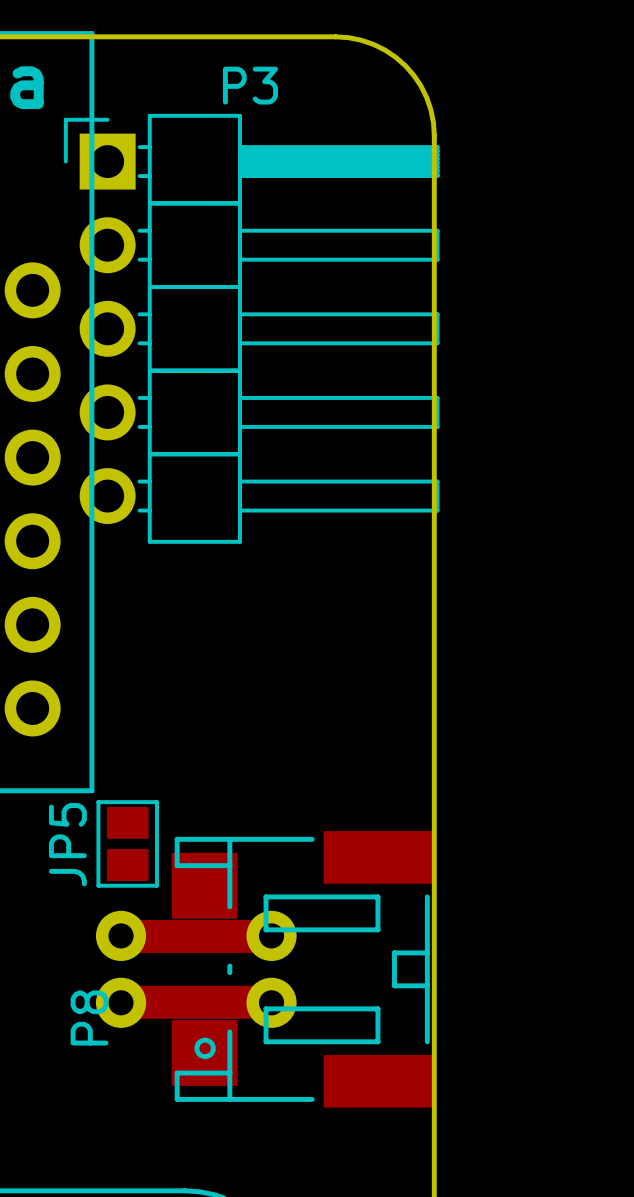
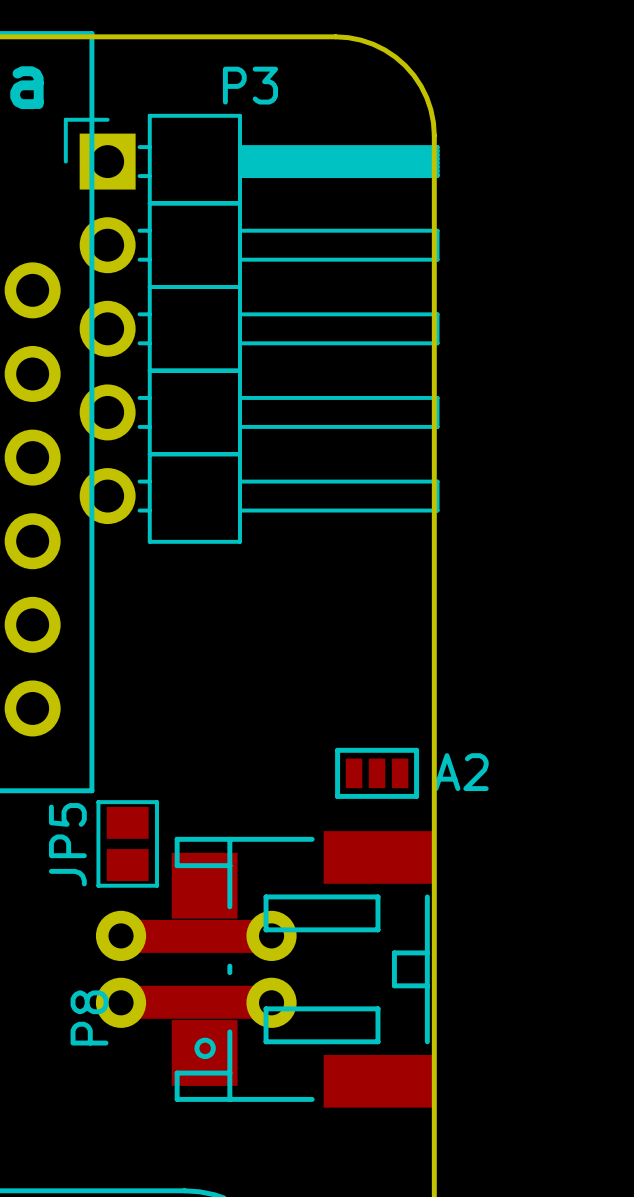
part: none -> A2 (377, 773)

